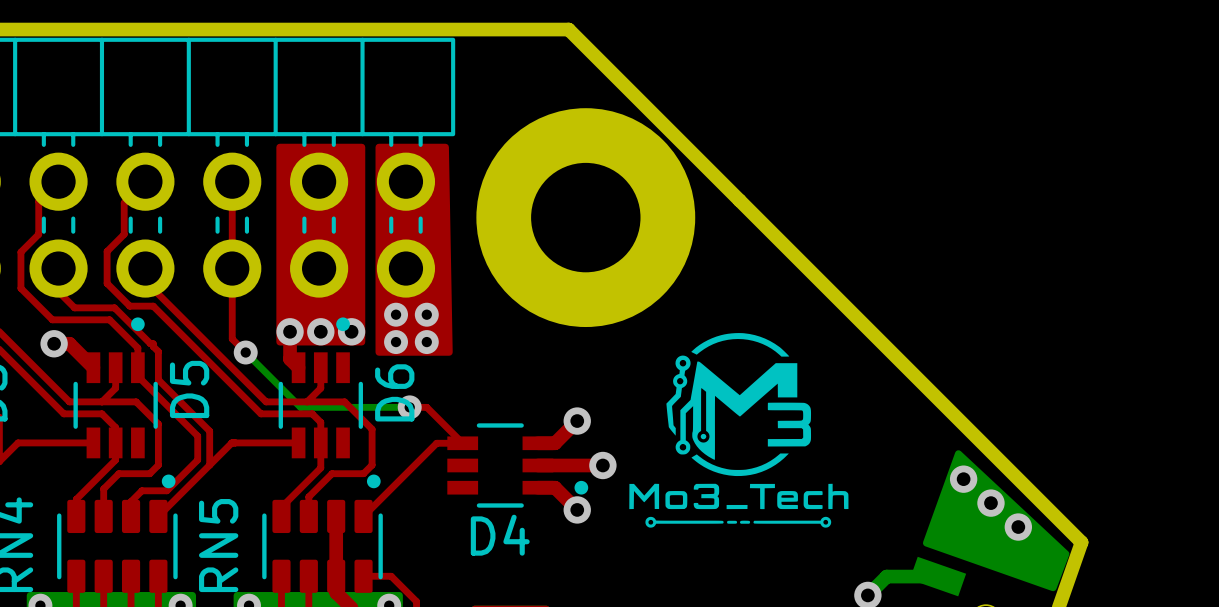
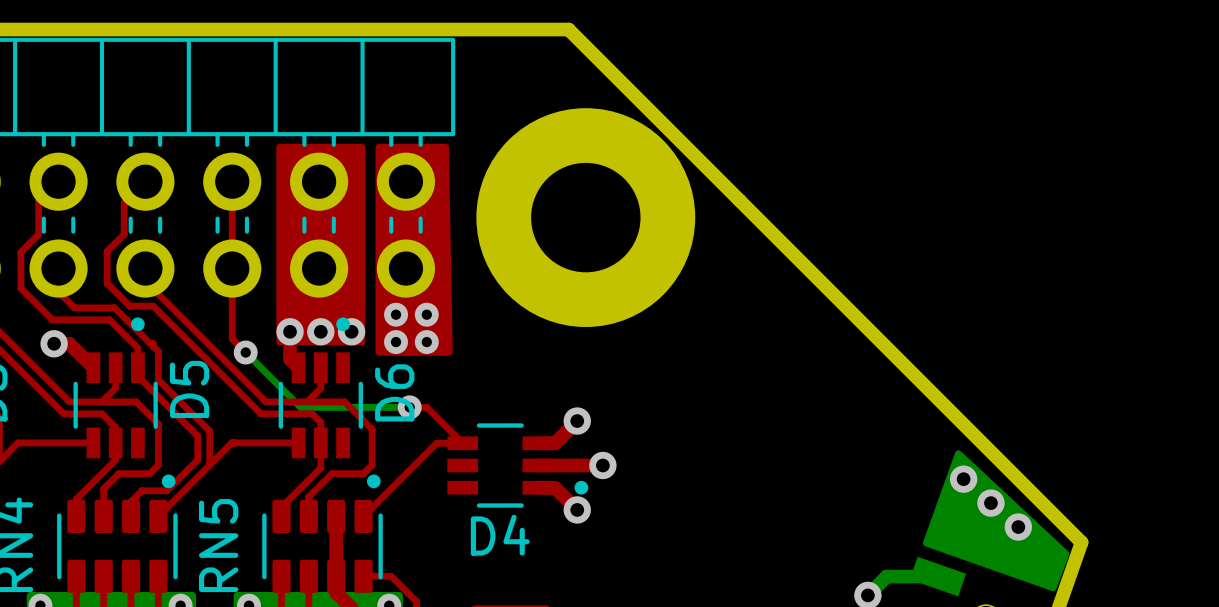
drawing: [629, 333, 849, 528] -> none

